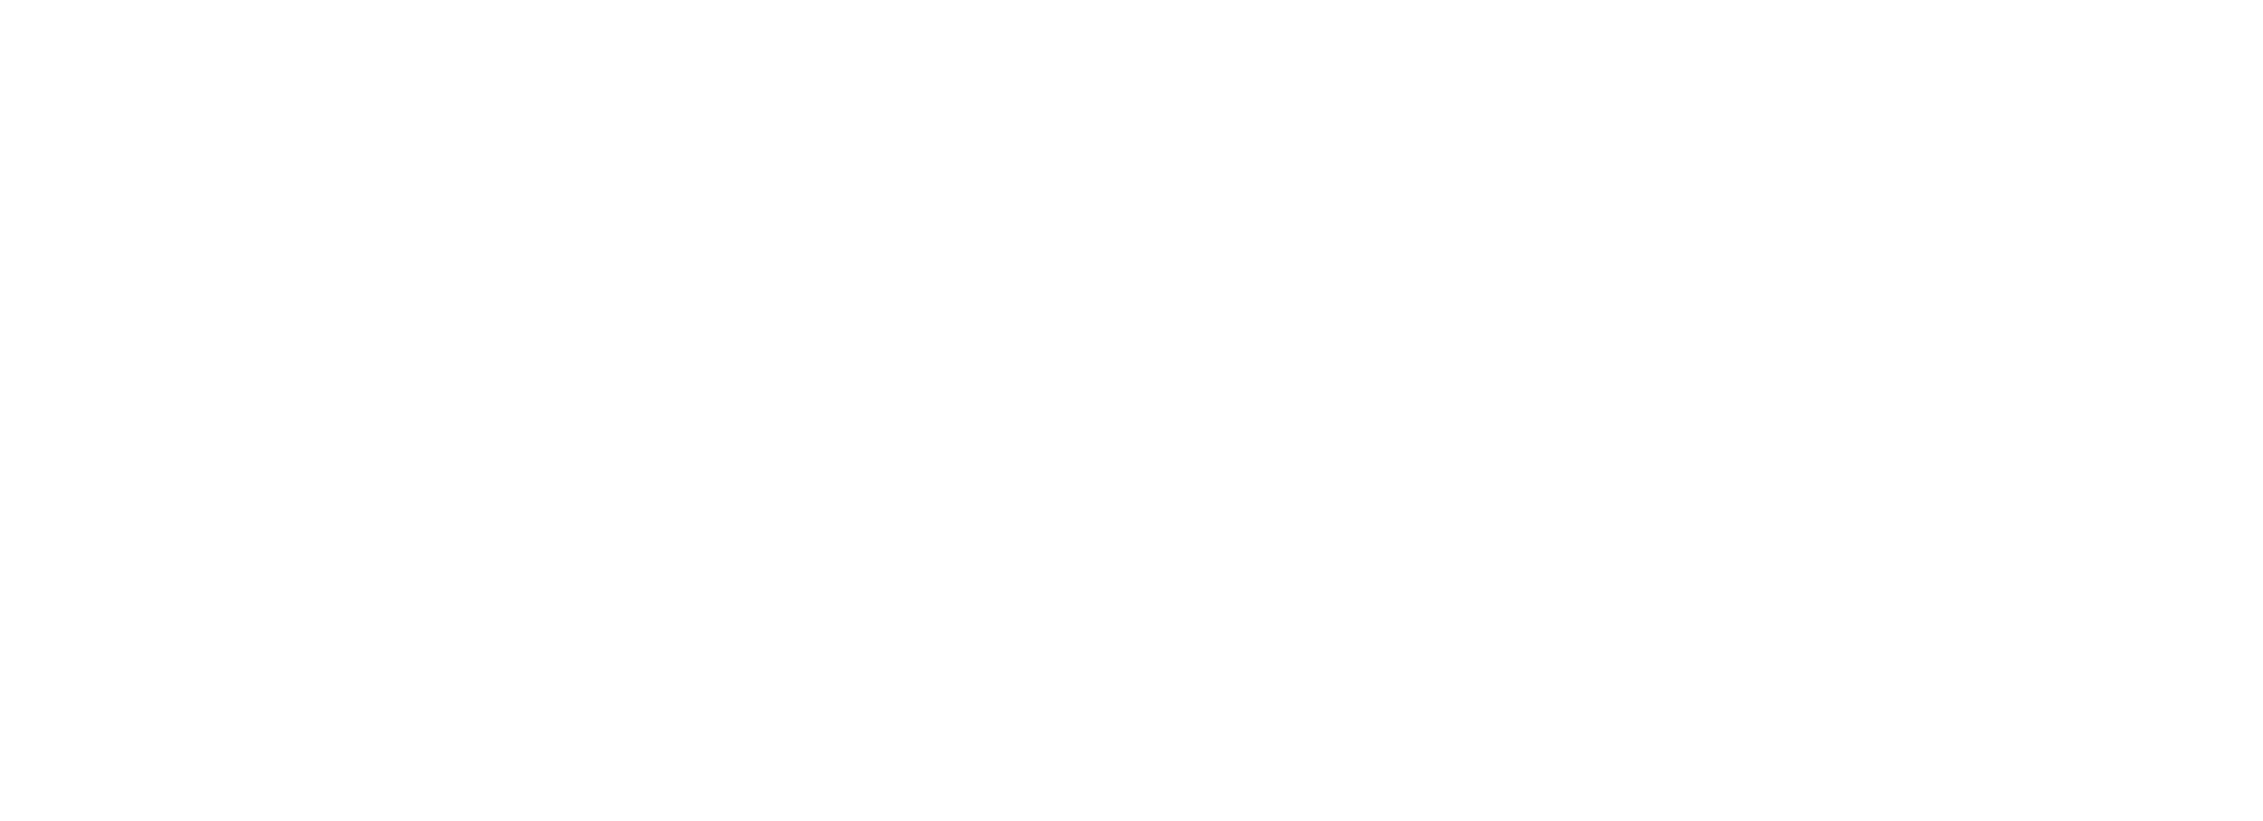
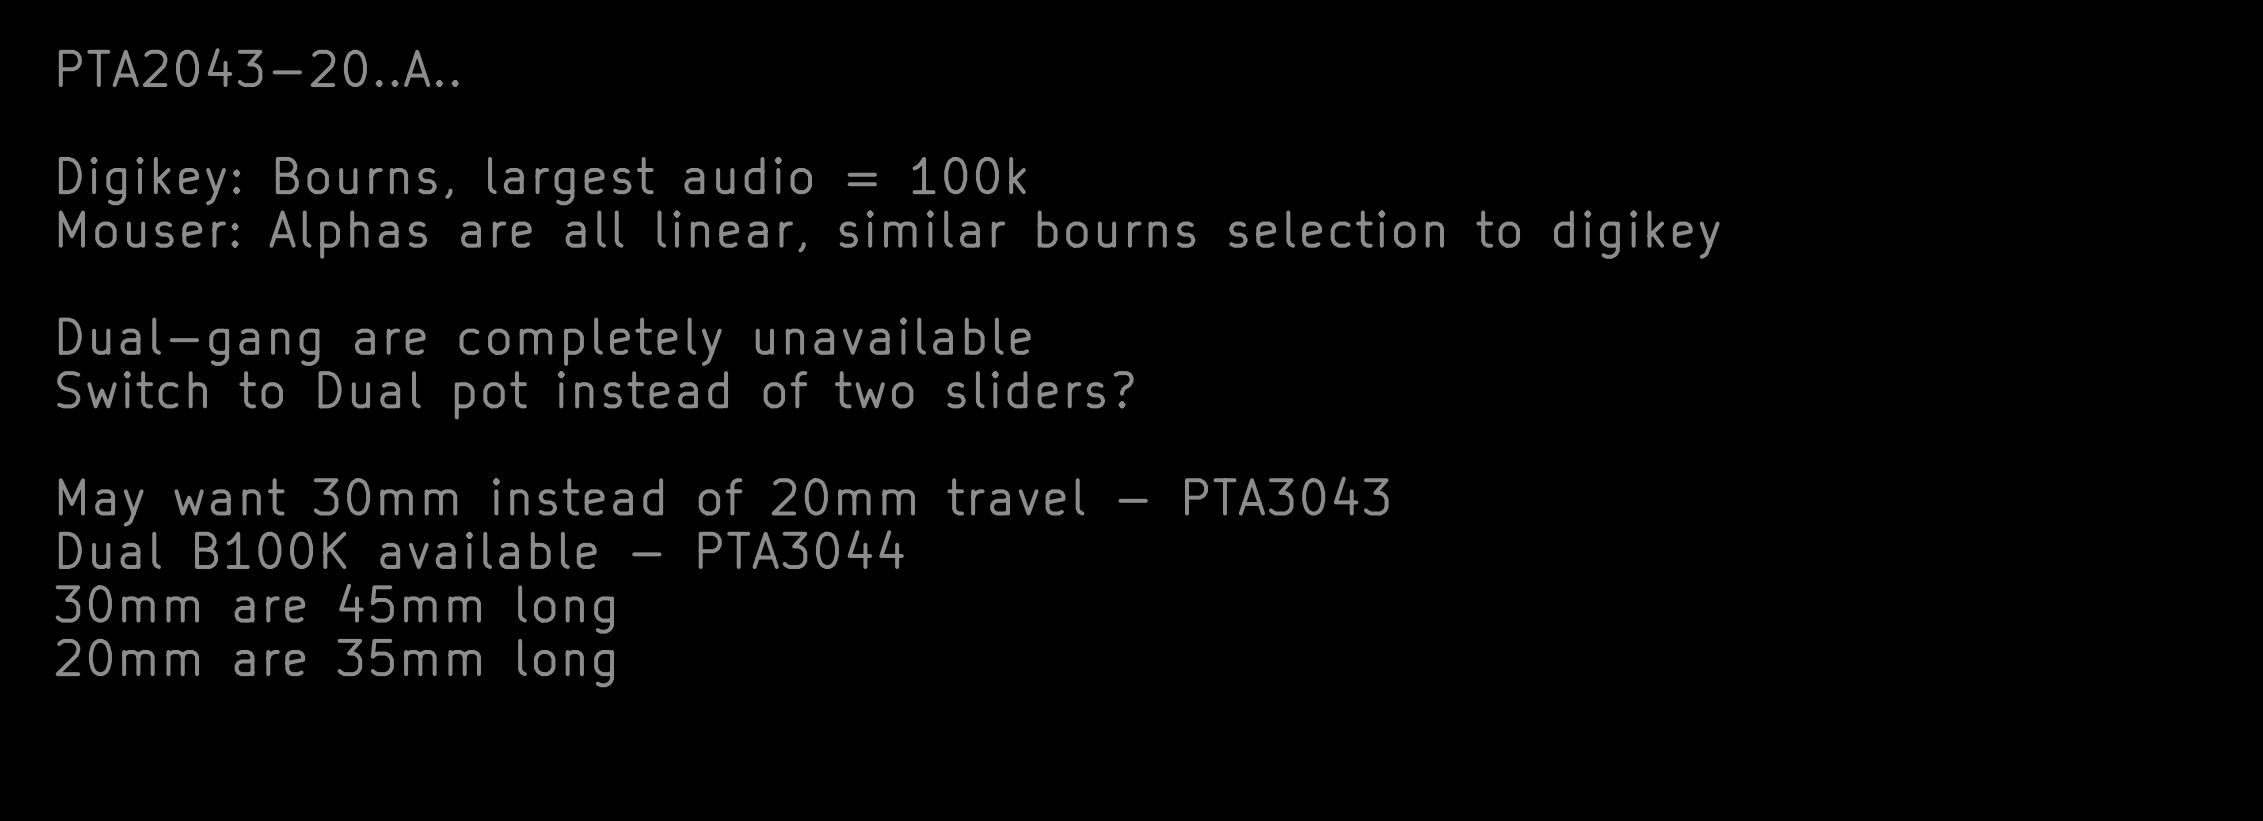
text: none -> PTA2043-20..A.. (258, 67)
text: none -> Digikey: Bourns, largest audio = 100k (542, 181)
text: none -> Mouser: Alphas are all linear, similar bourns selection to digikey (889, 234)
text: none -> Dual-gang are completely unavailable (544, 341)
text: none -> Switch to Dual pot instead of two sliders? (595, 395)
text: none -> May want 30mm instead of 20mm travel - PTA3043 (723, 501)
text: none -> Dual B100K available - PTA3044 (481, 549)
text: none -> 30mm are 45mm long (334, 608)
text: none -> 20mm are 35mm long (334, 663)

